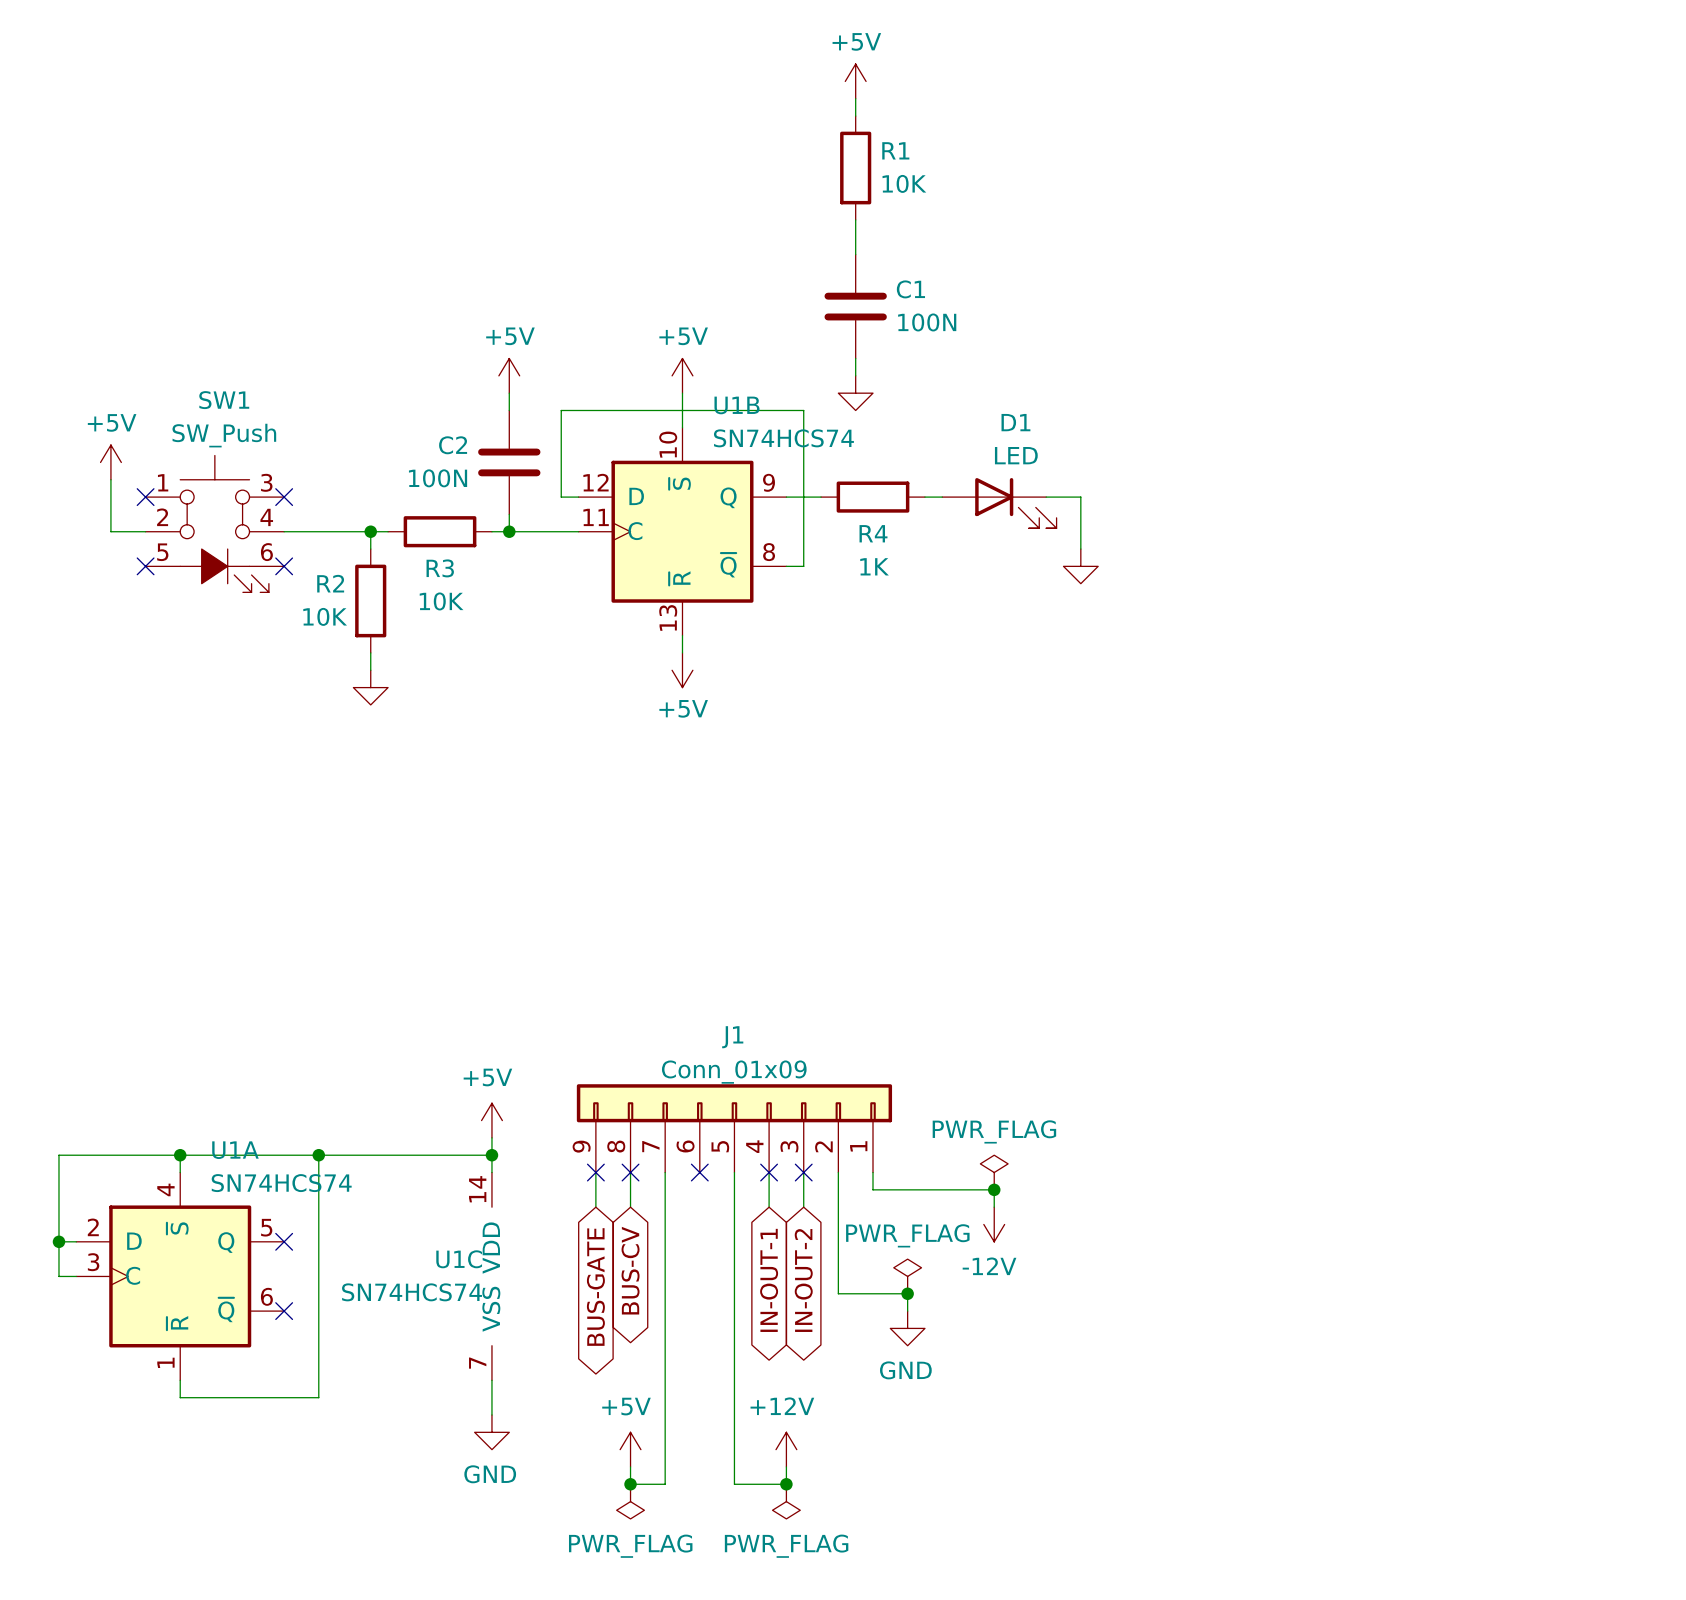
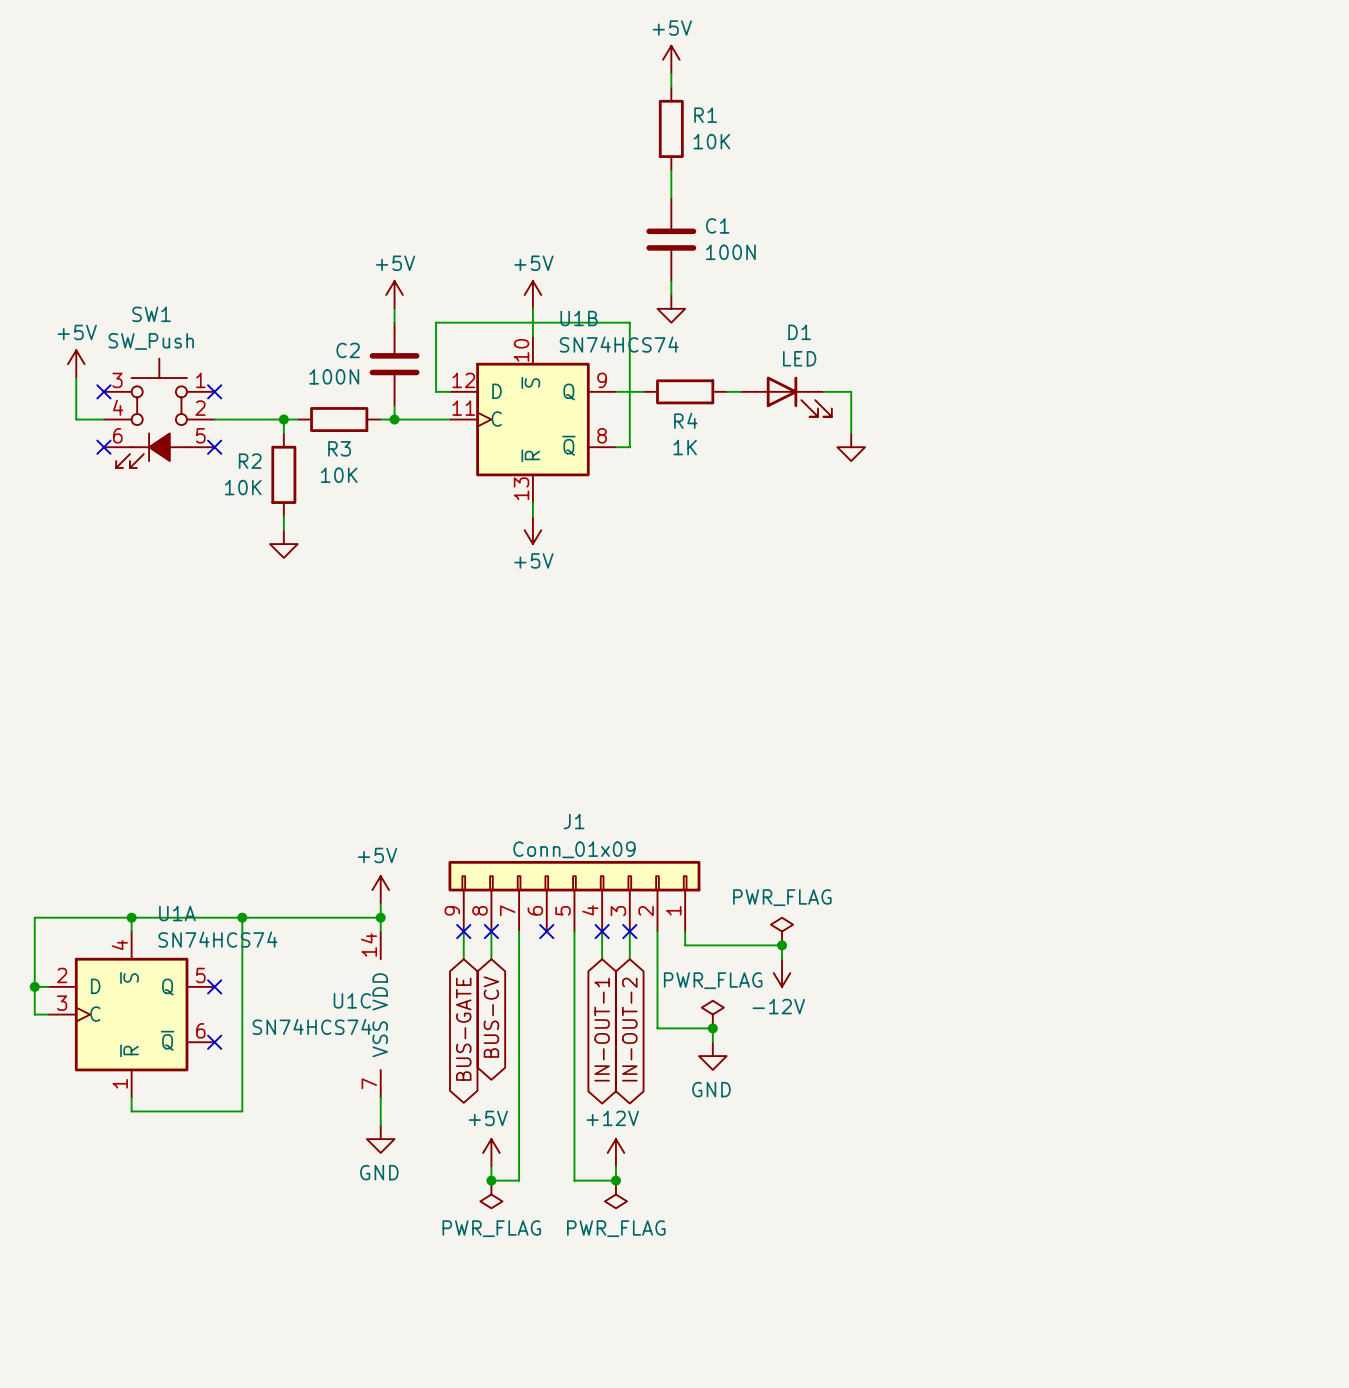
SW1 flip: as is (224, 523) -> left-right (151, 413)

